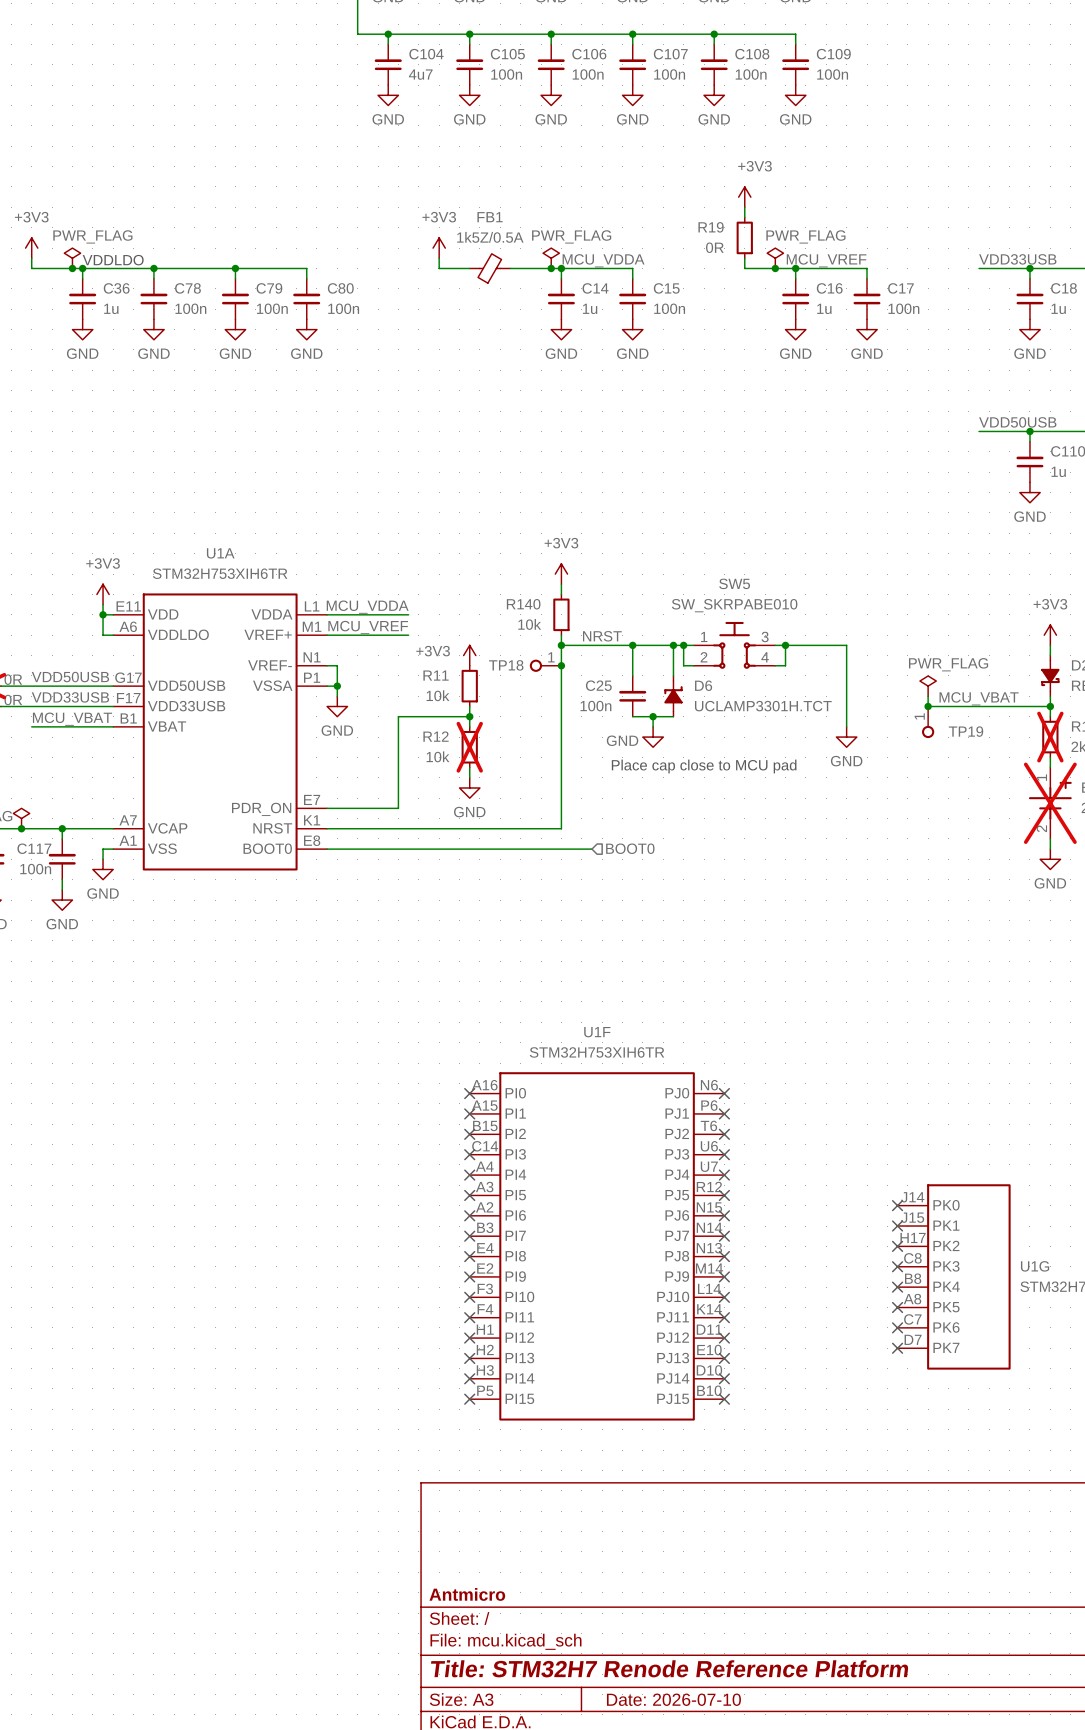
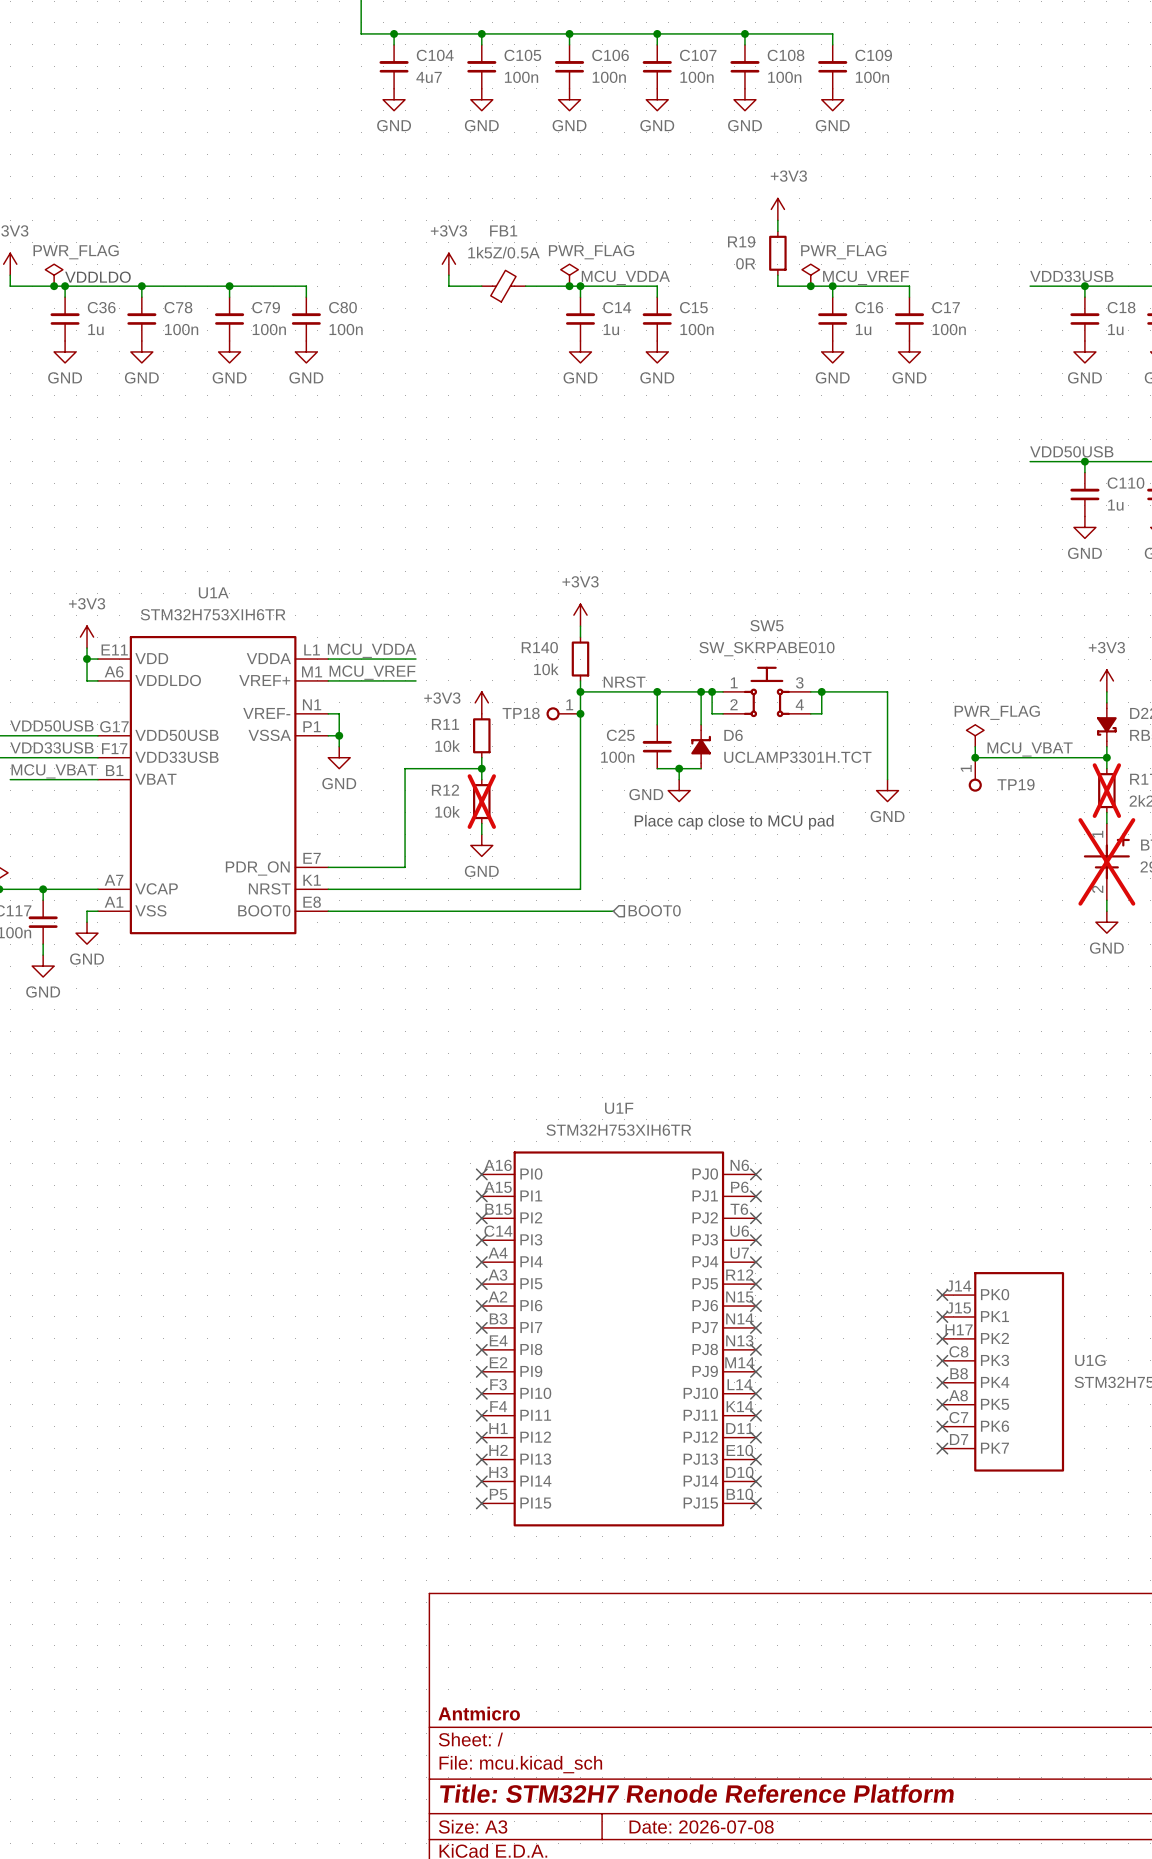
title block: Date: 2026-07-10 (673, 1699) -> Date: 2026-07-08 (701, 1826)

